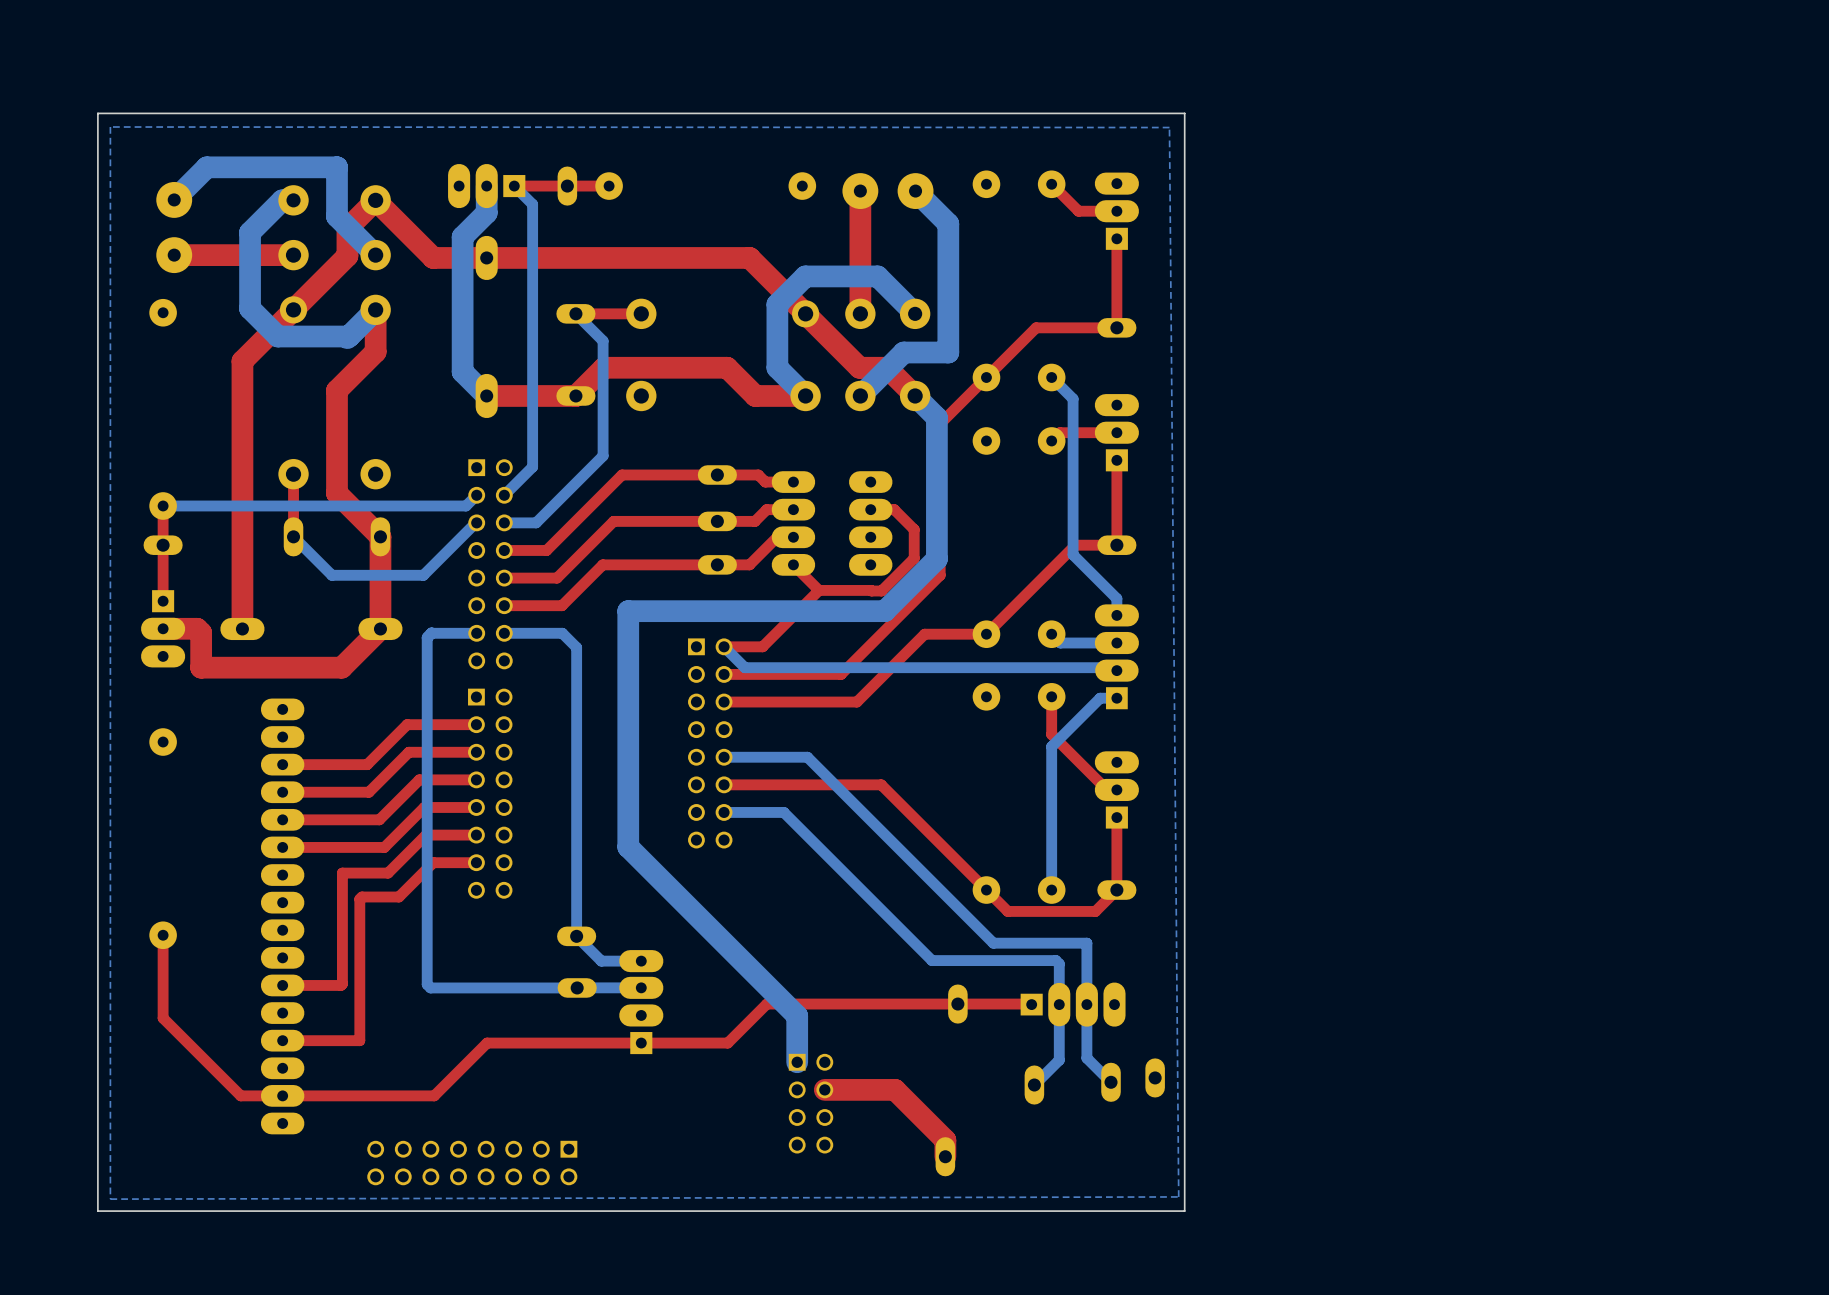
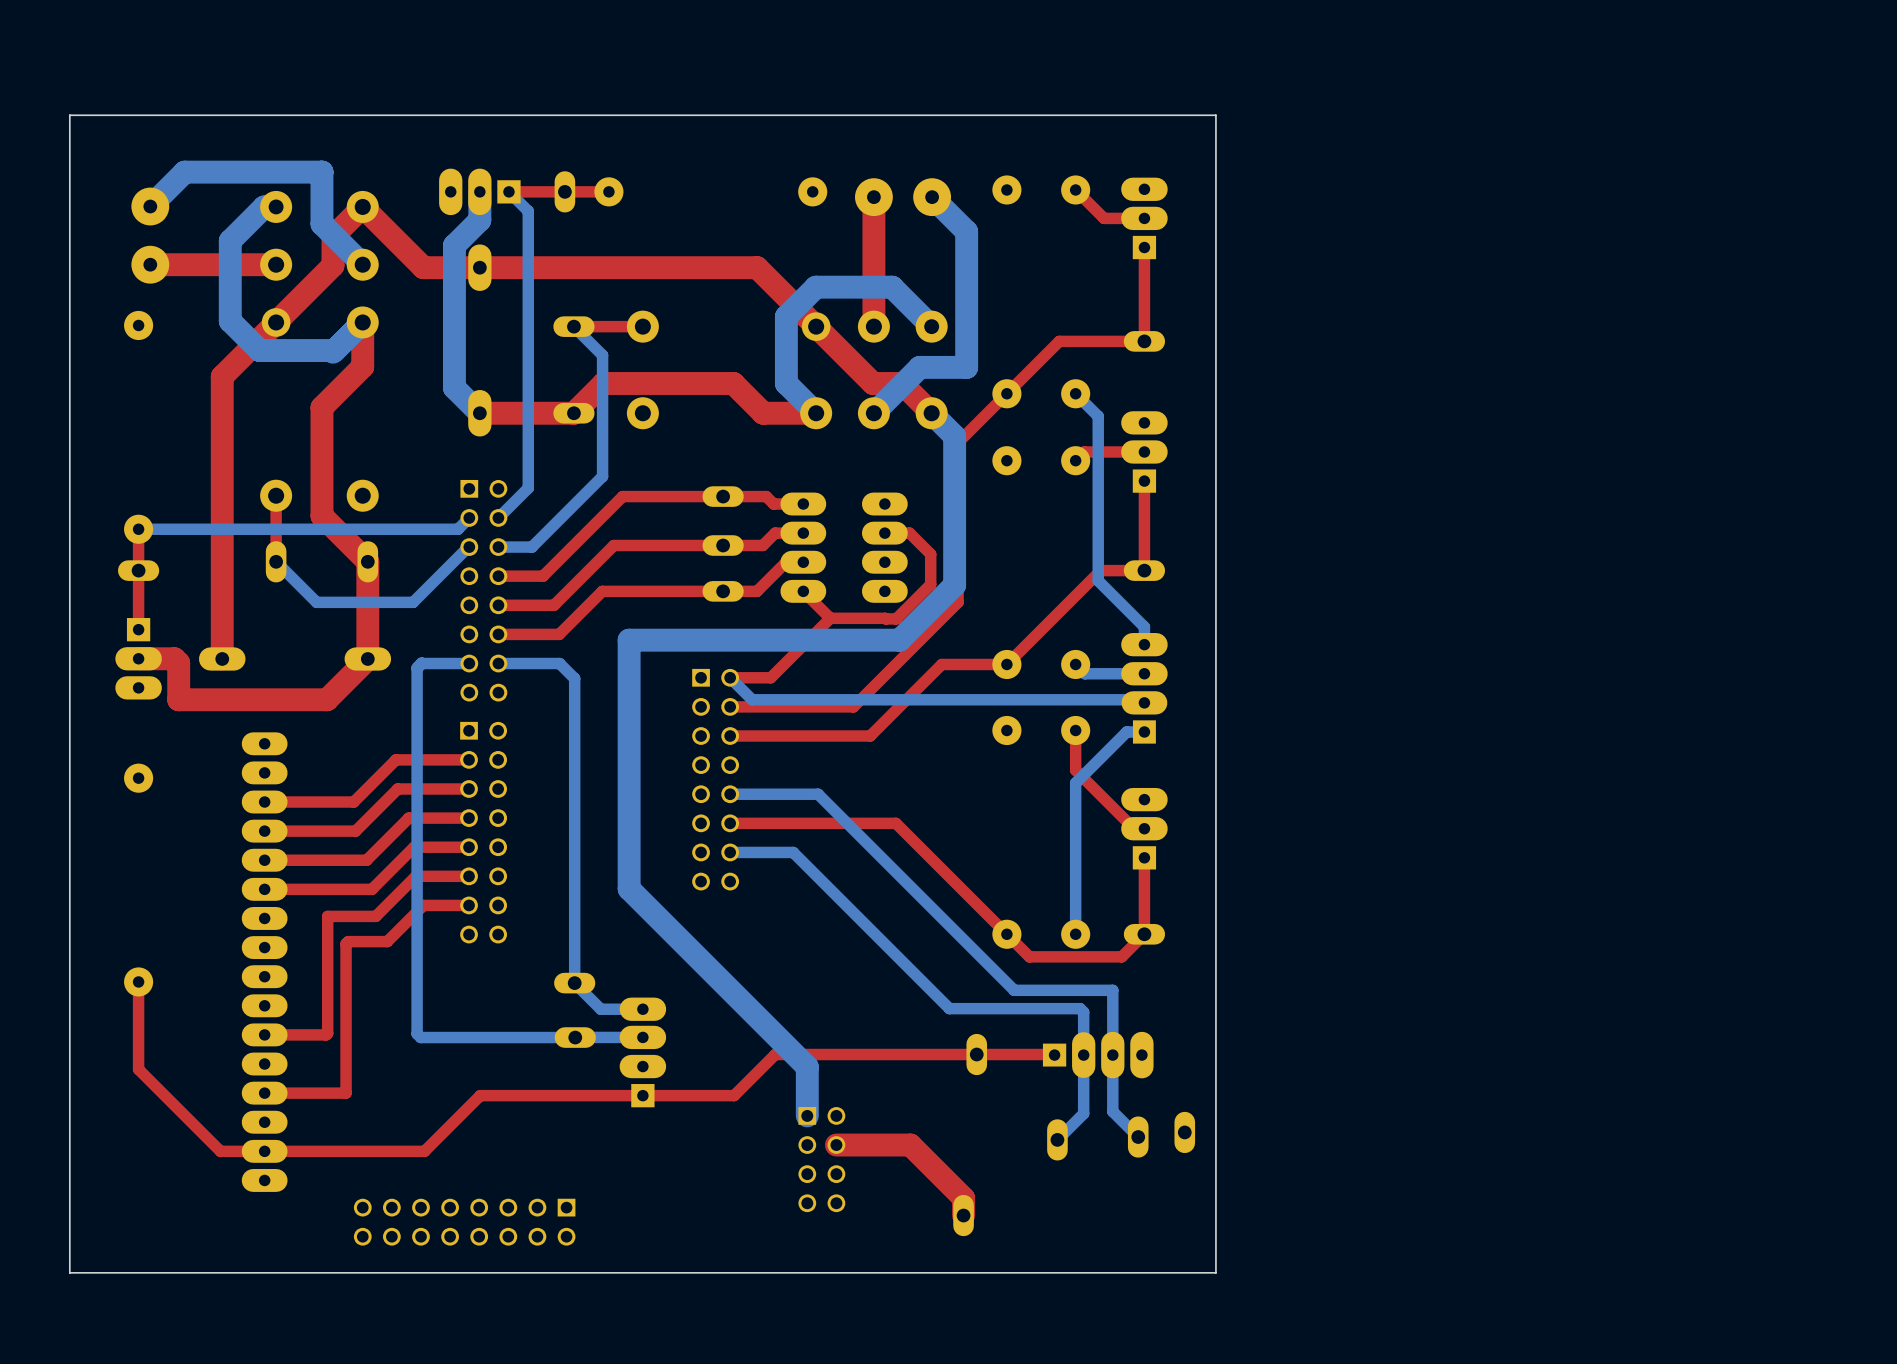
bottom zone outline: (110, 127) (1169, 127) (1178, 1196) (110, 1199) (110, 127) -> none

